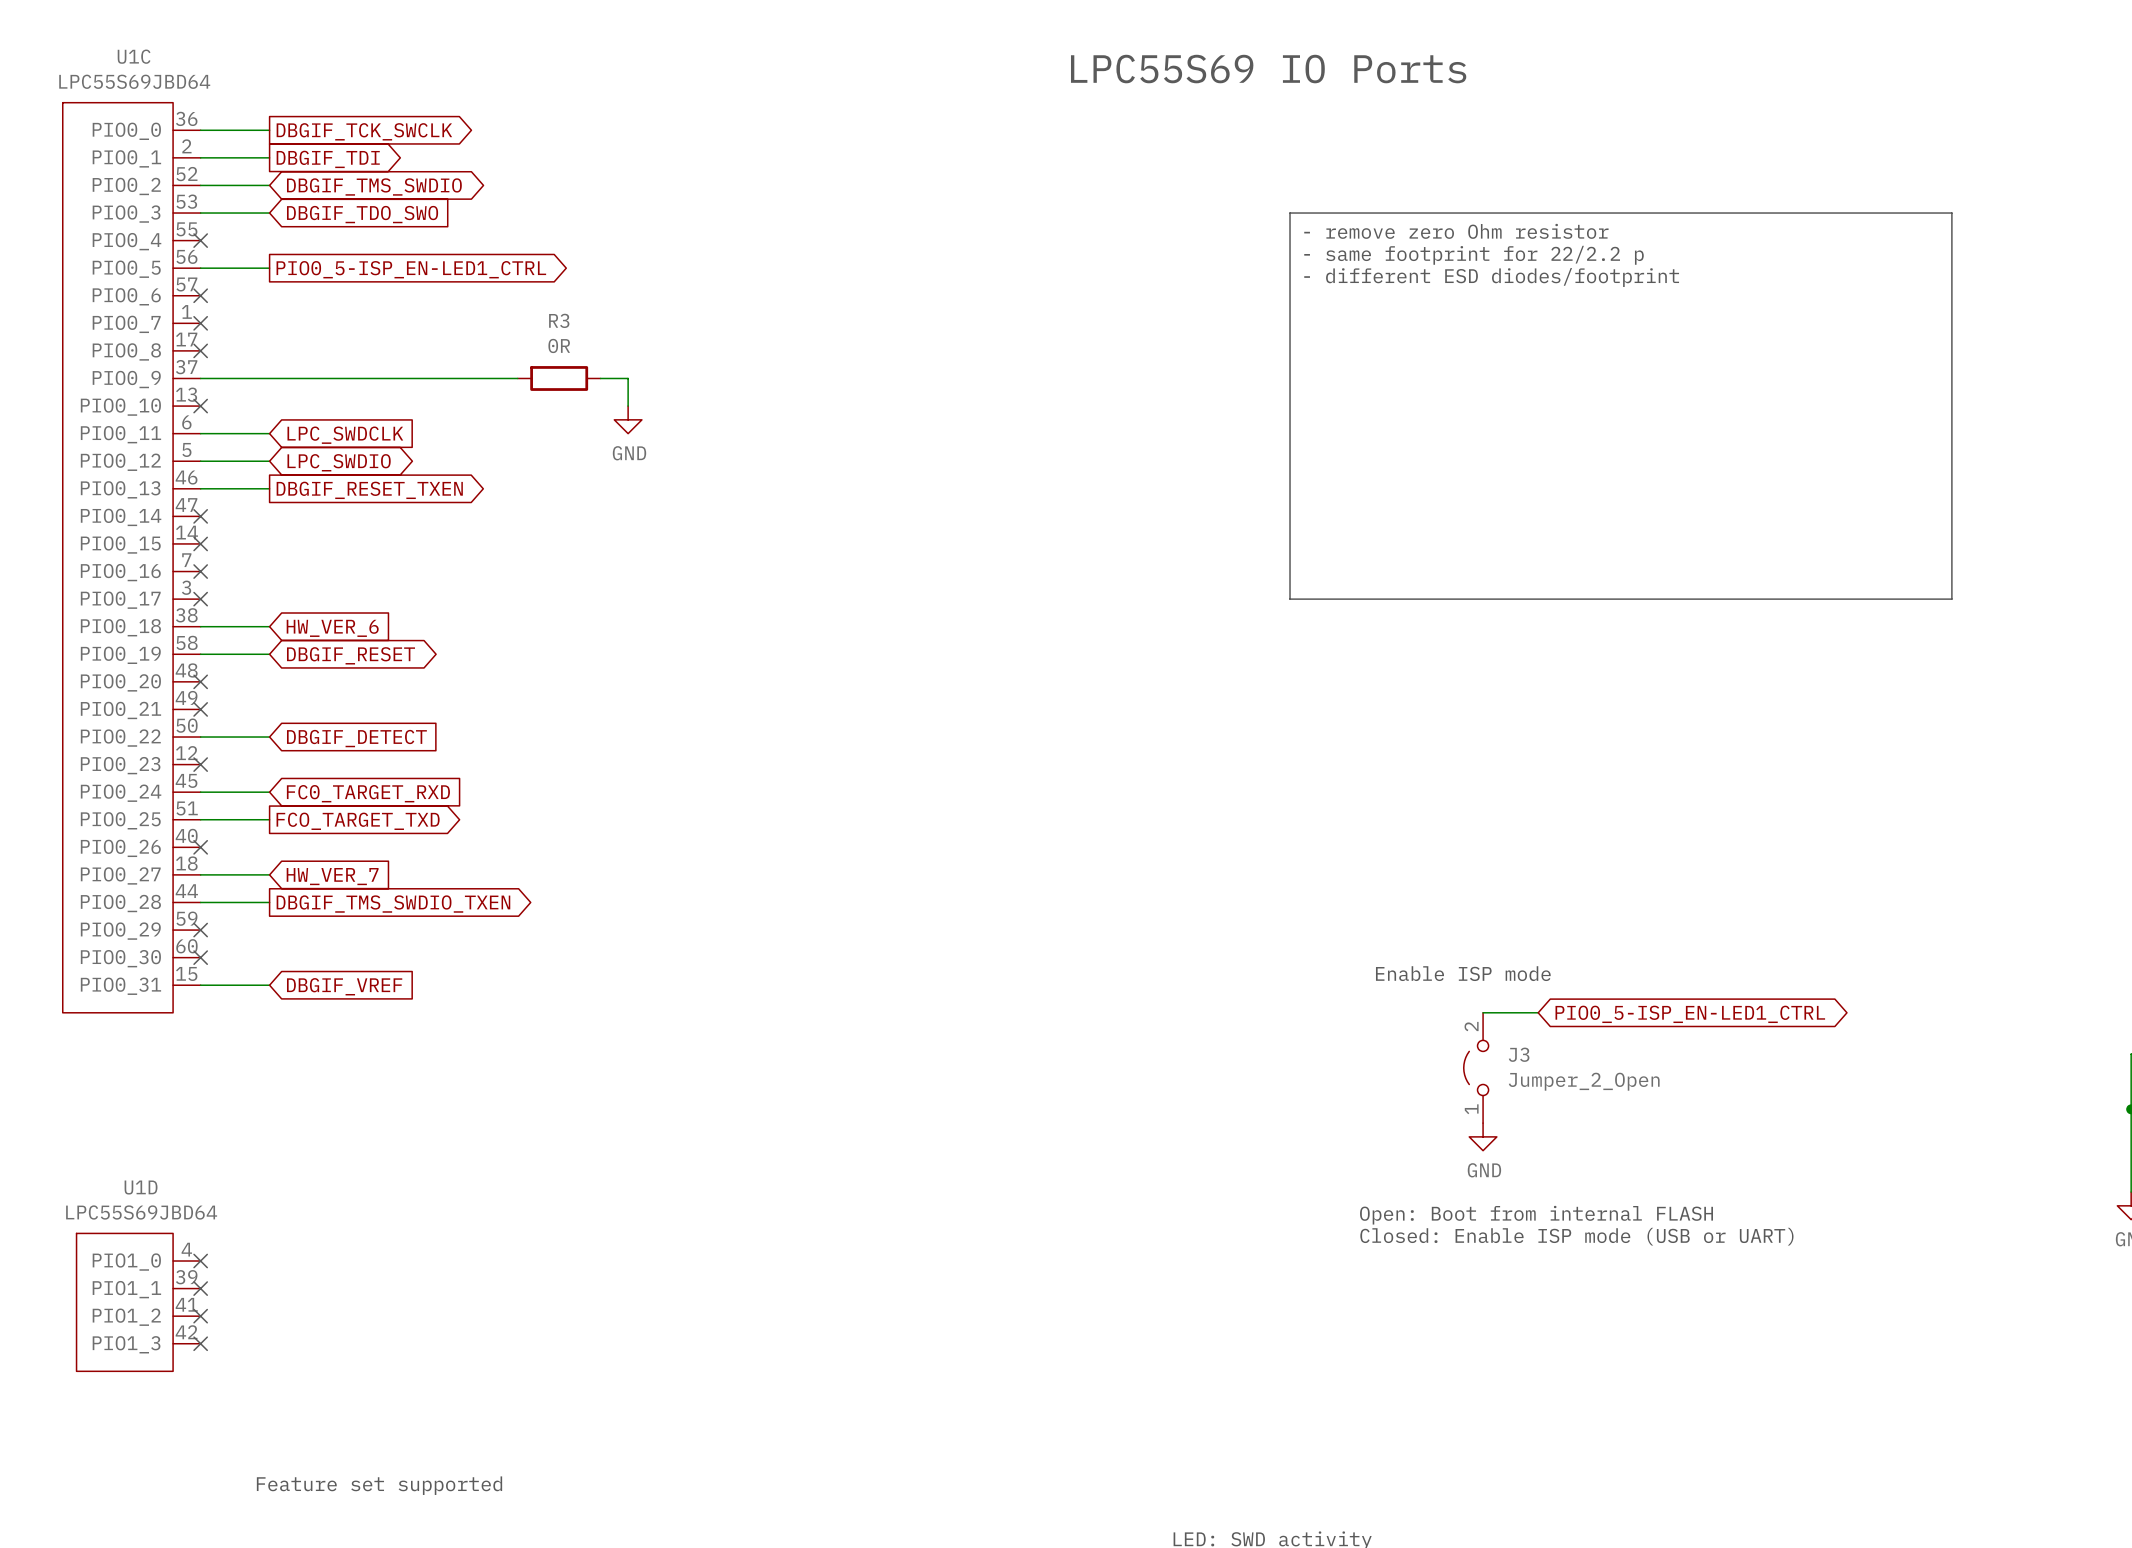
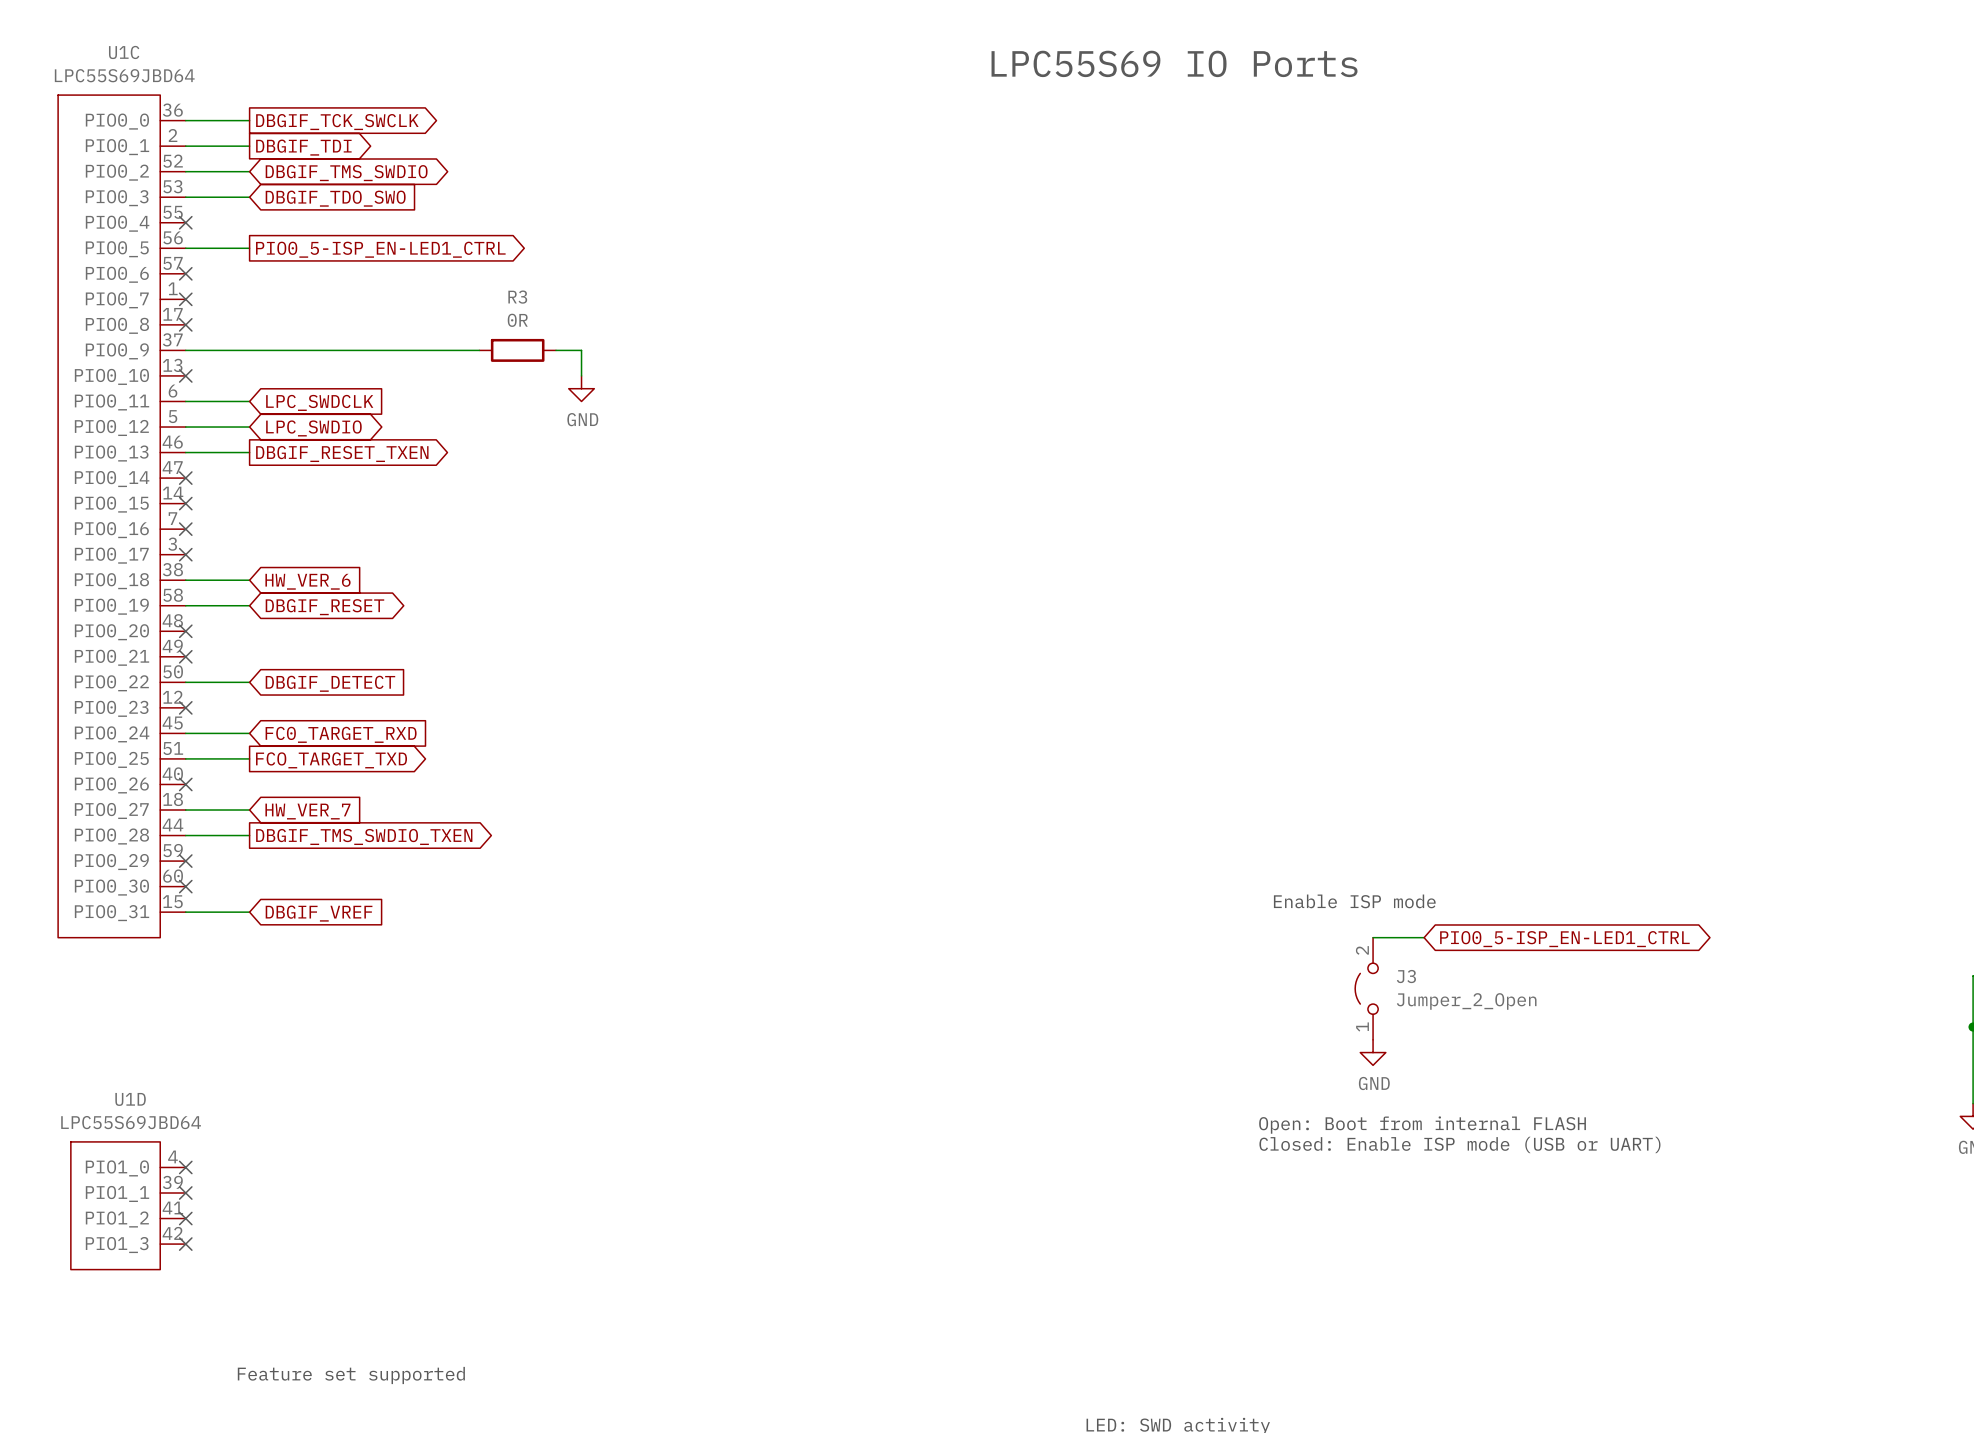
line: (1290, 213) (1951, 213) (1951, 599) (1290, 599) (1290, 213) -> none
text: - remove zero Ohm resistor (1456, 231) -> none
text: - same footprint for 22/2.2 p (1473, 255) -> none
text: - different ESD diodes/footprint (1491, 277) -> none

